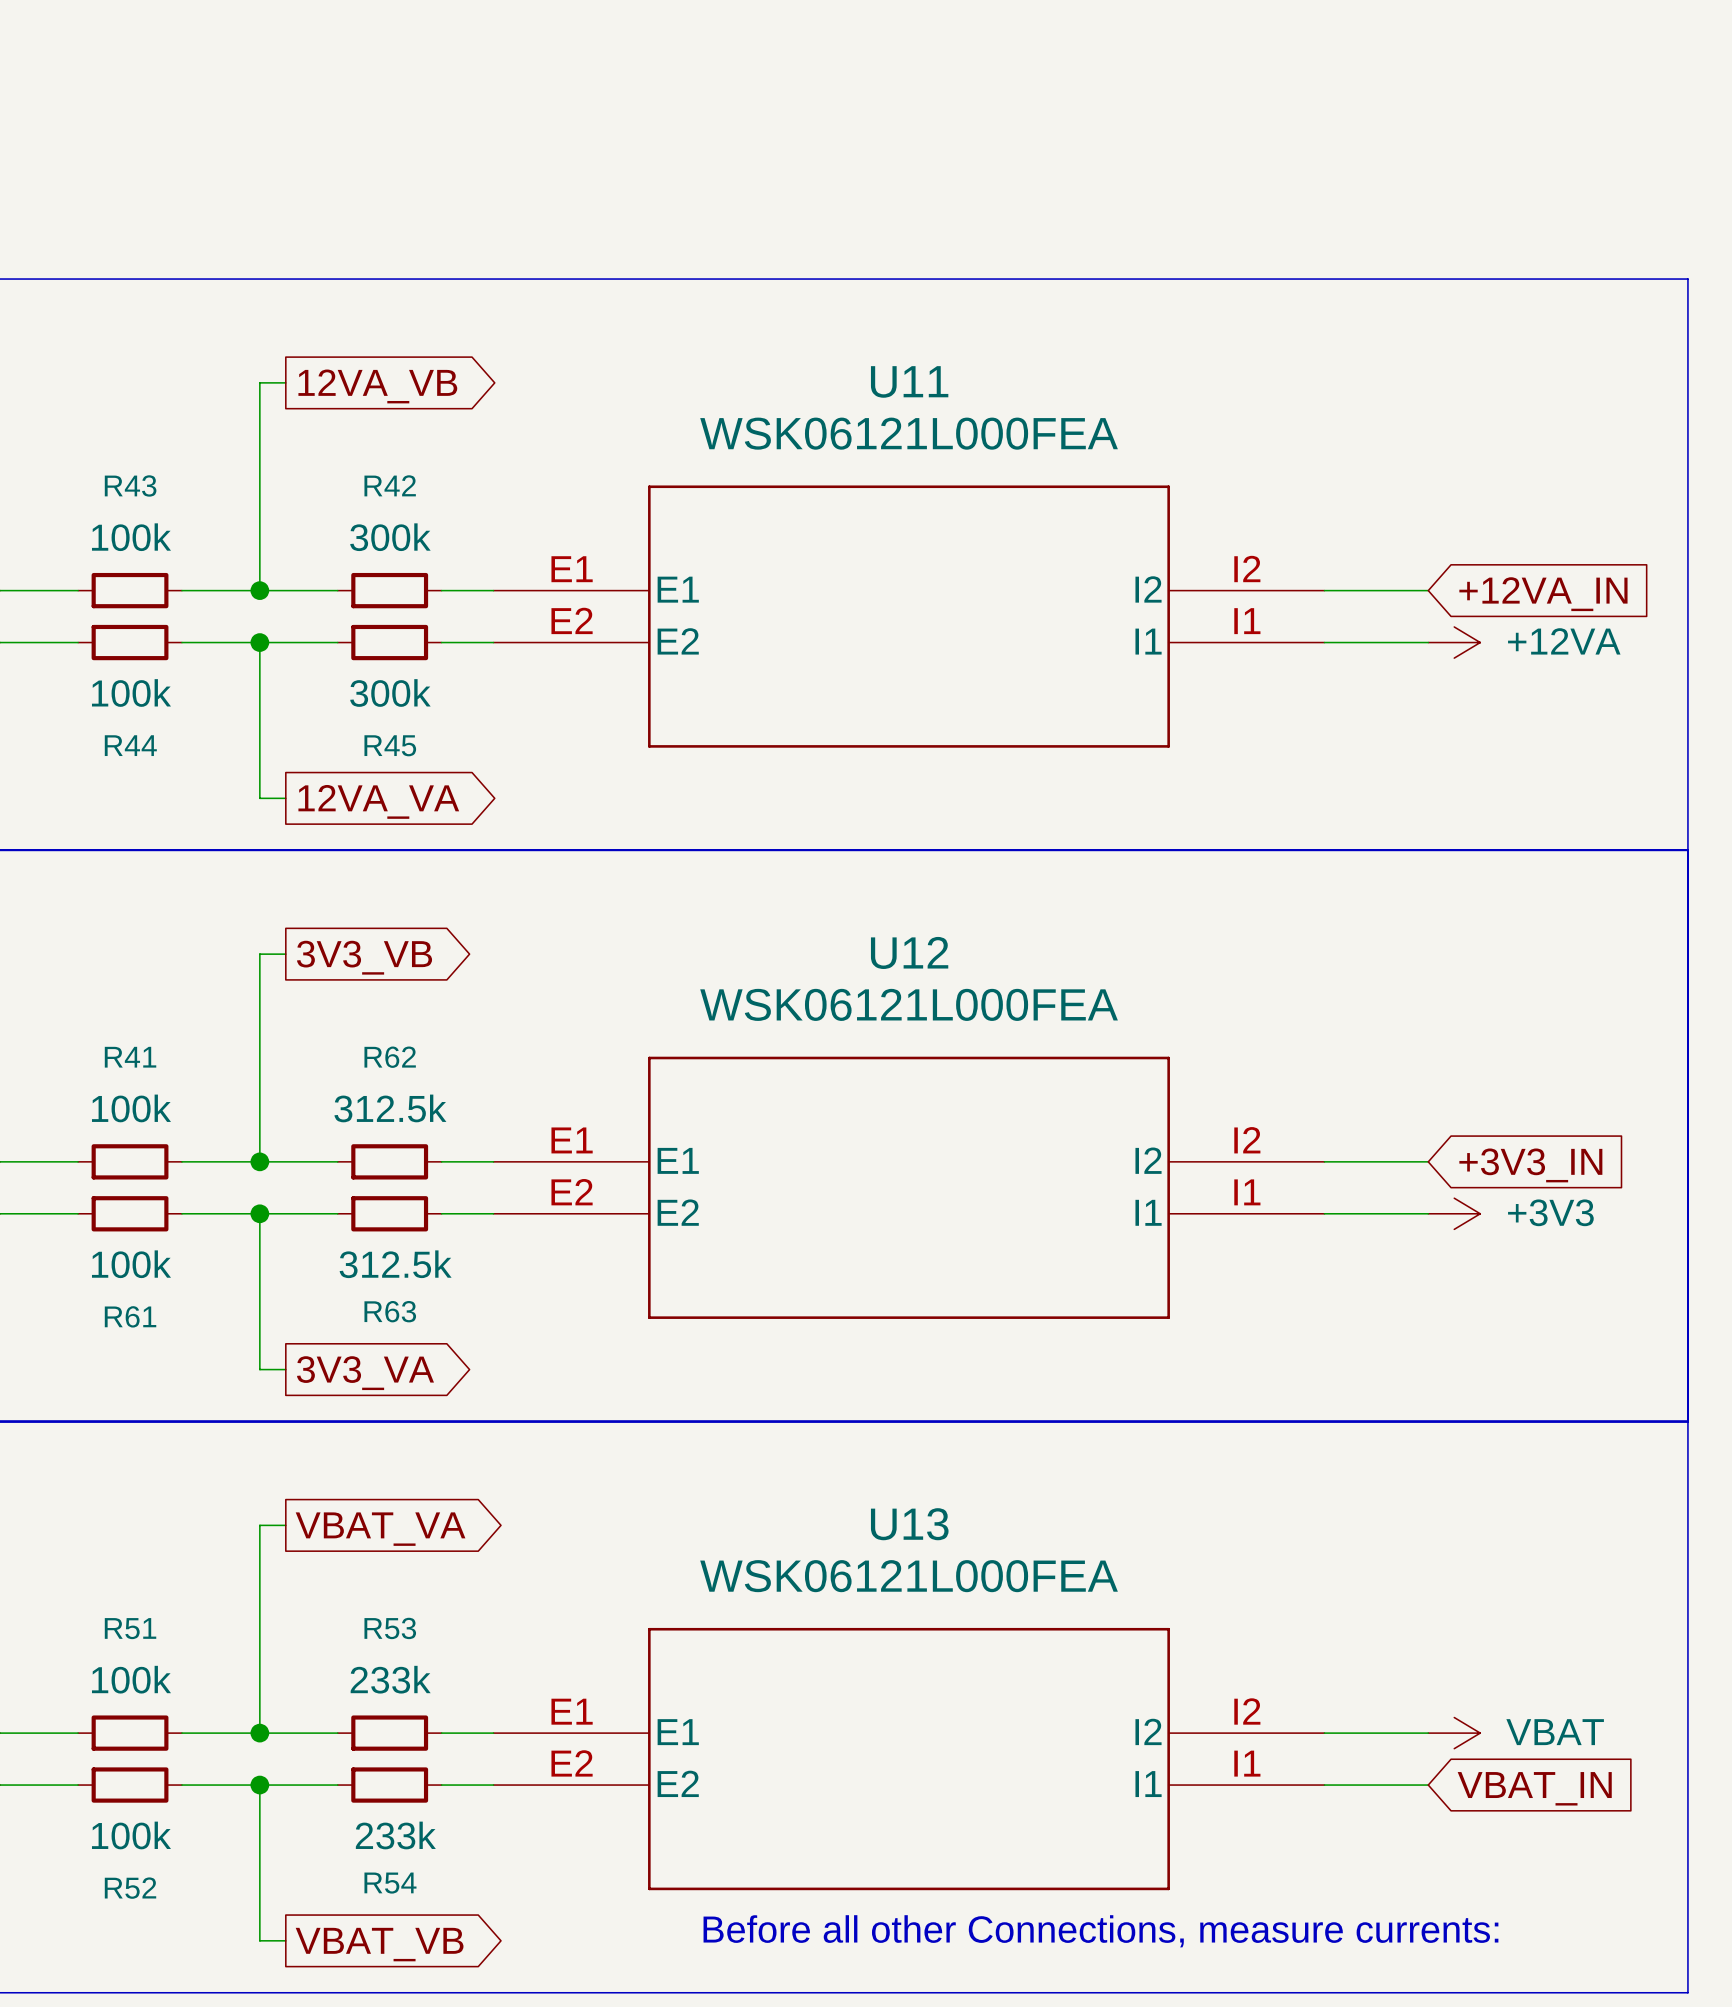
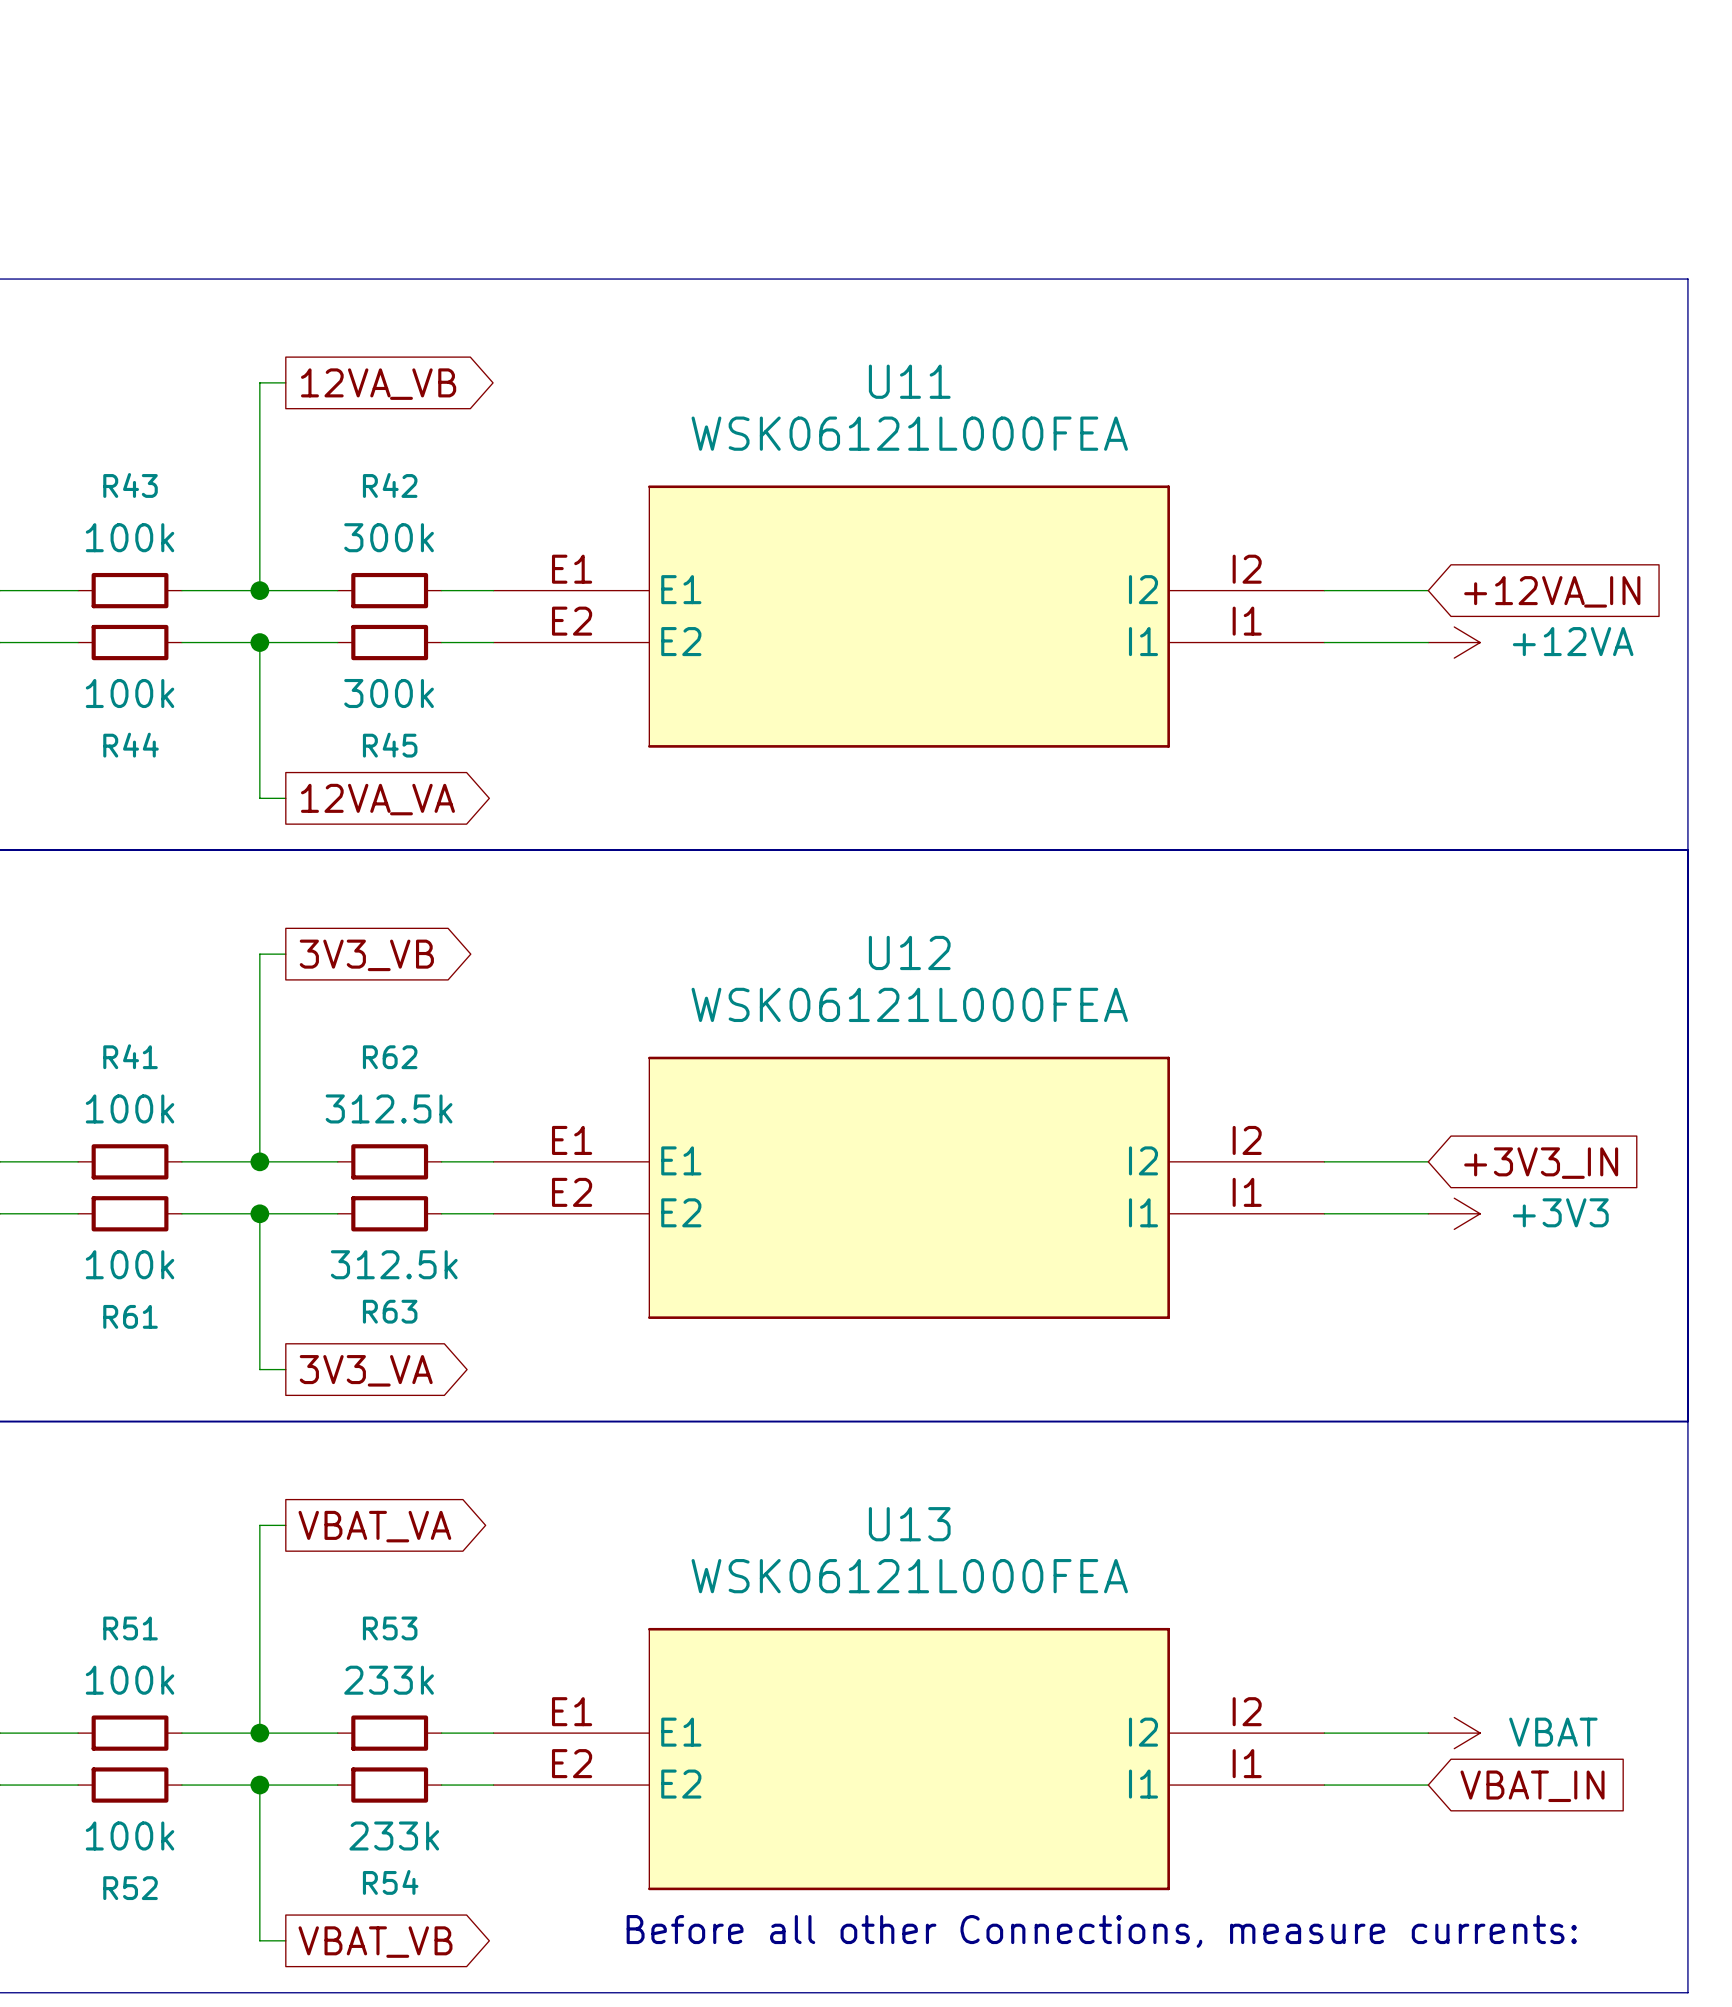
U11 symbol: [493, 485, 1325, 748] -> [493, 485, 1325, 748]
U12 symbol: [493, 1056, 1325, 1319] -> [493, 1056, 1325, 1319]
U13 symbol: [493, 1627, 1325, 1891] -> [493, 1627, 1325, 1891]

